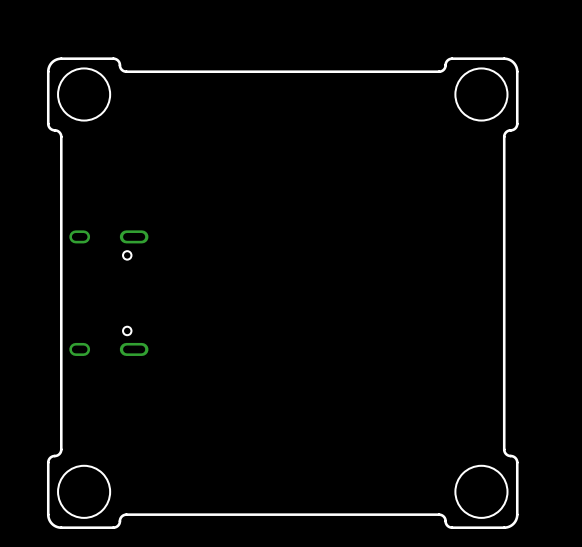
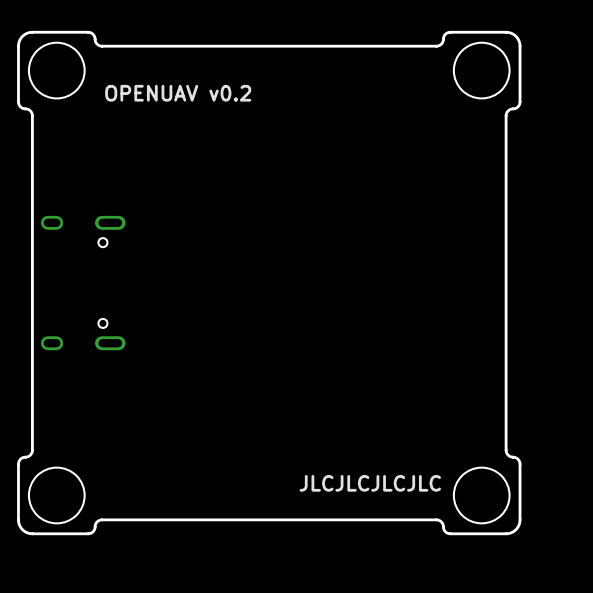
text: none -> OPENUAV v0.2 (178, 93)
text: none -> JLCJLCJLCJLC (370, 483)

